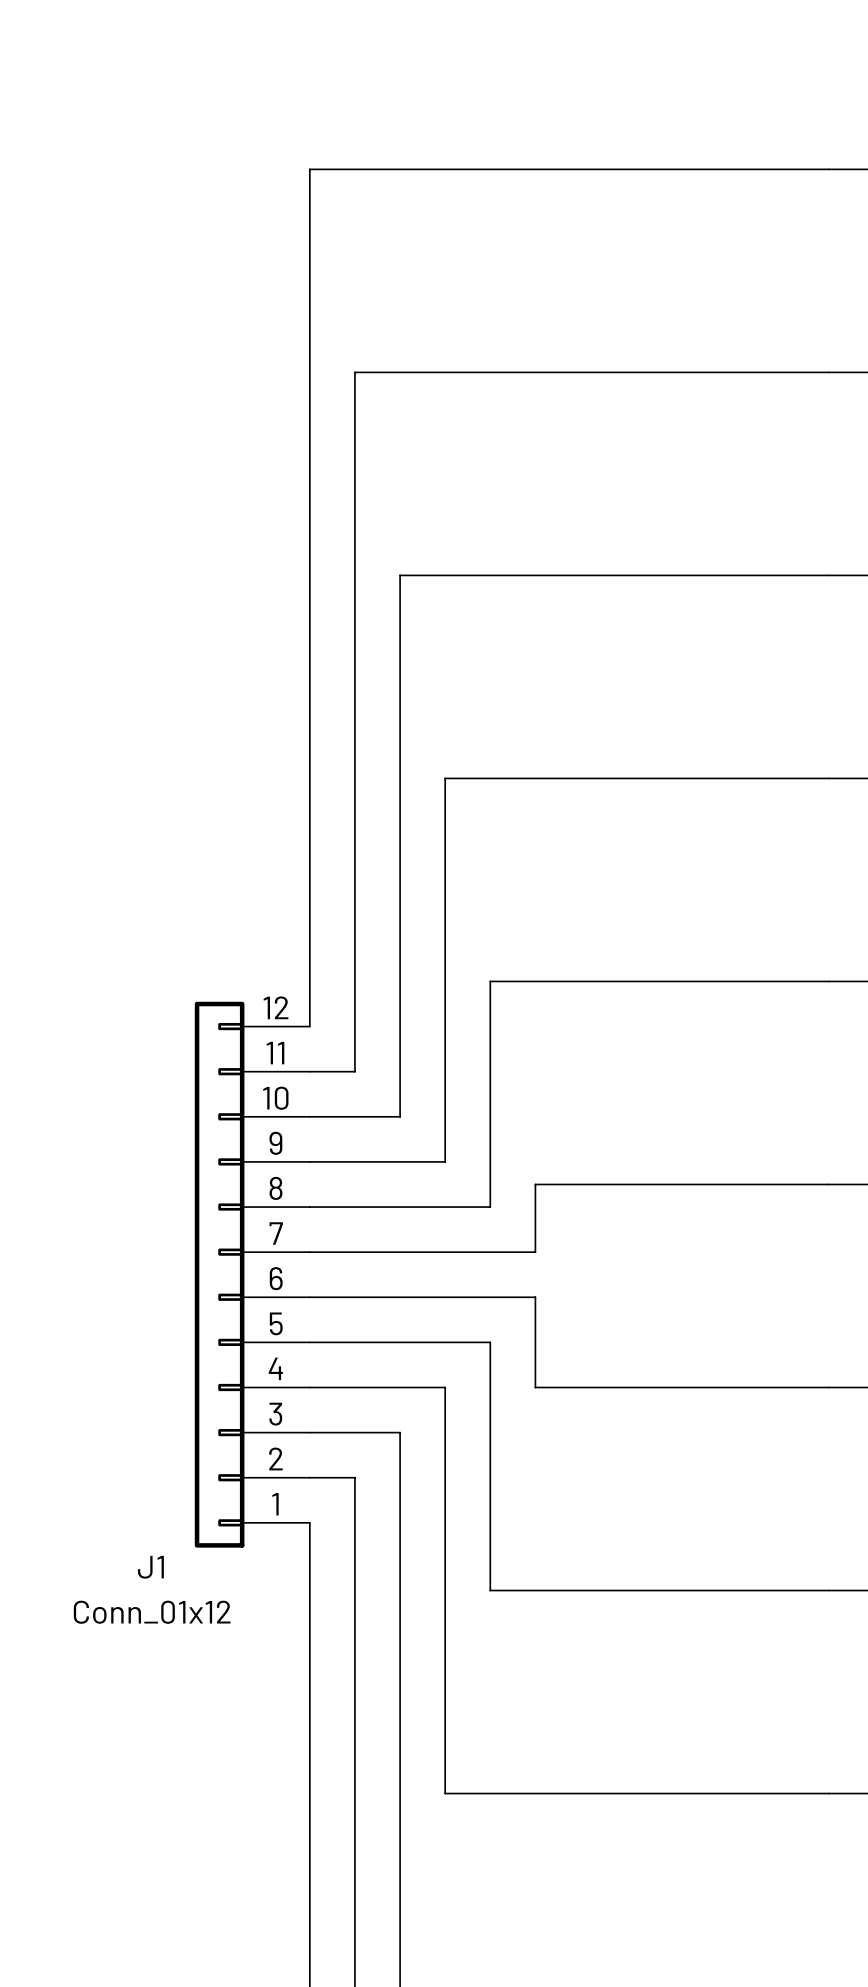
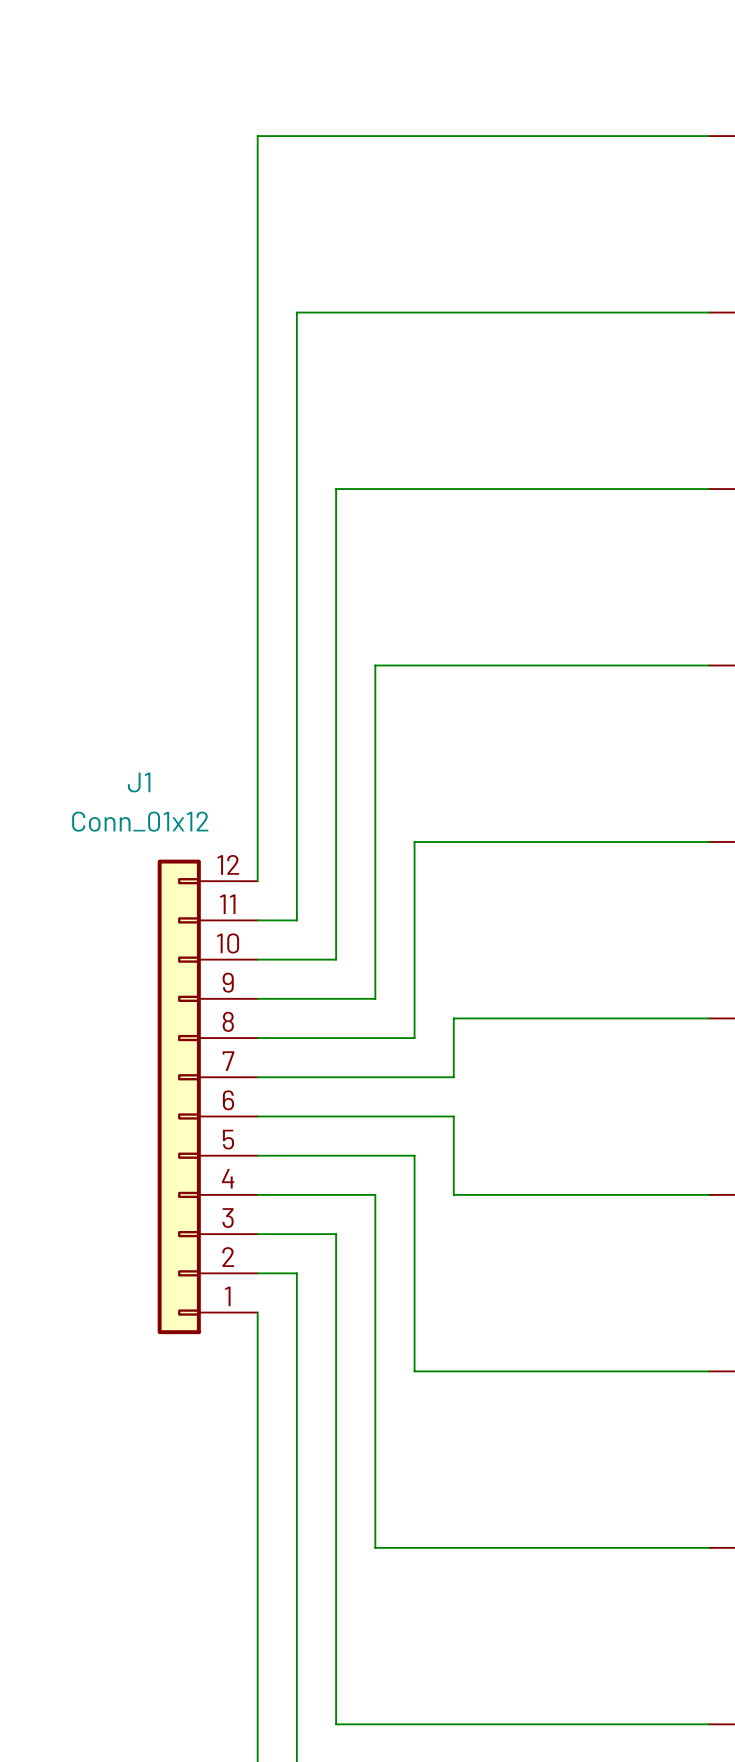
J1 name position: J1 (150, 1567) -> J1 (139, 782)
J1 value position: Conn_01x12 (152, 1612) -> Conn_01x12 (140, 821)

